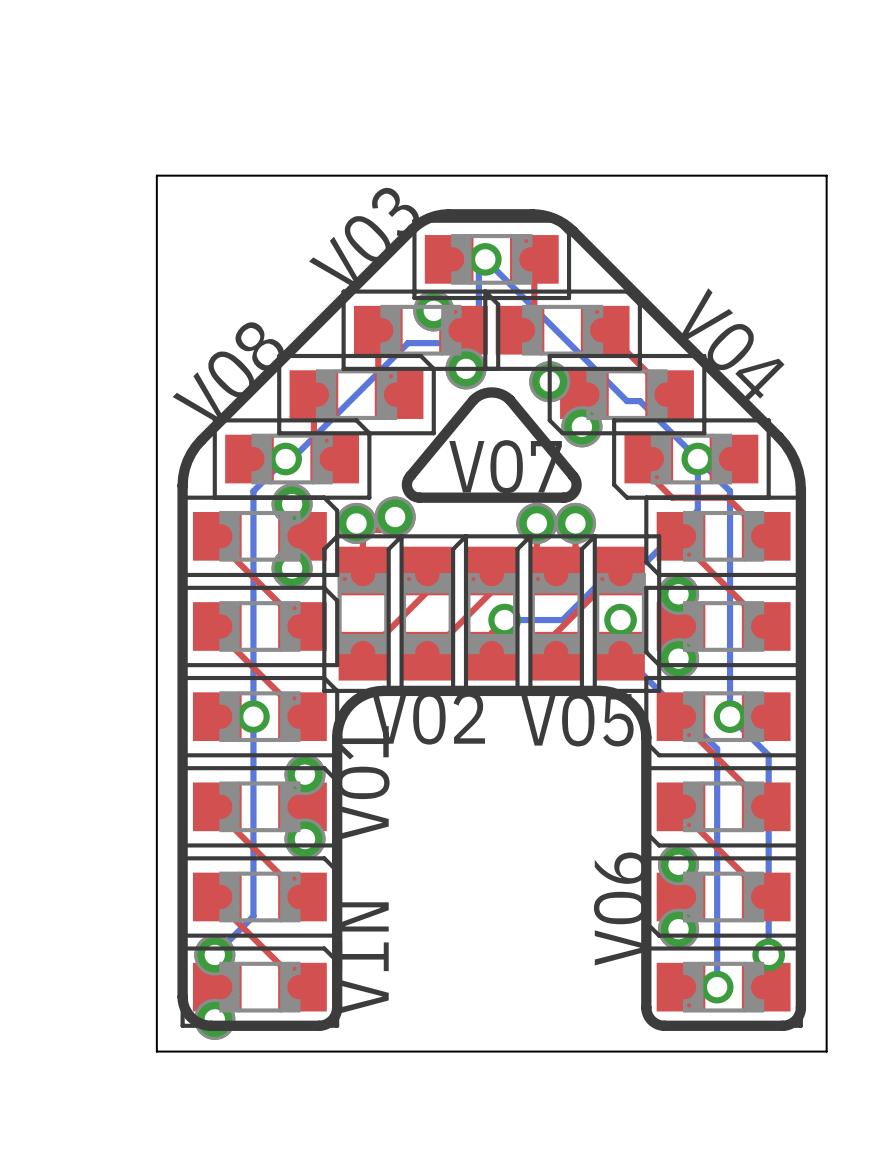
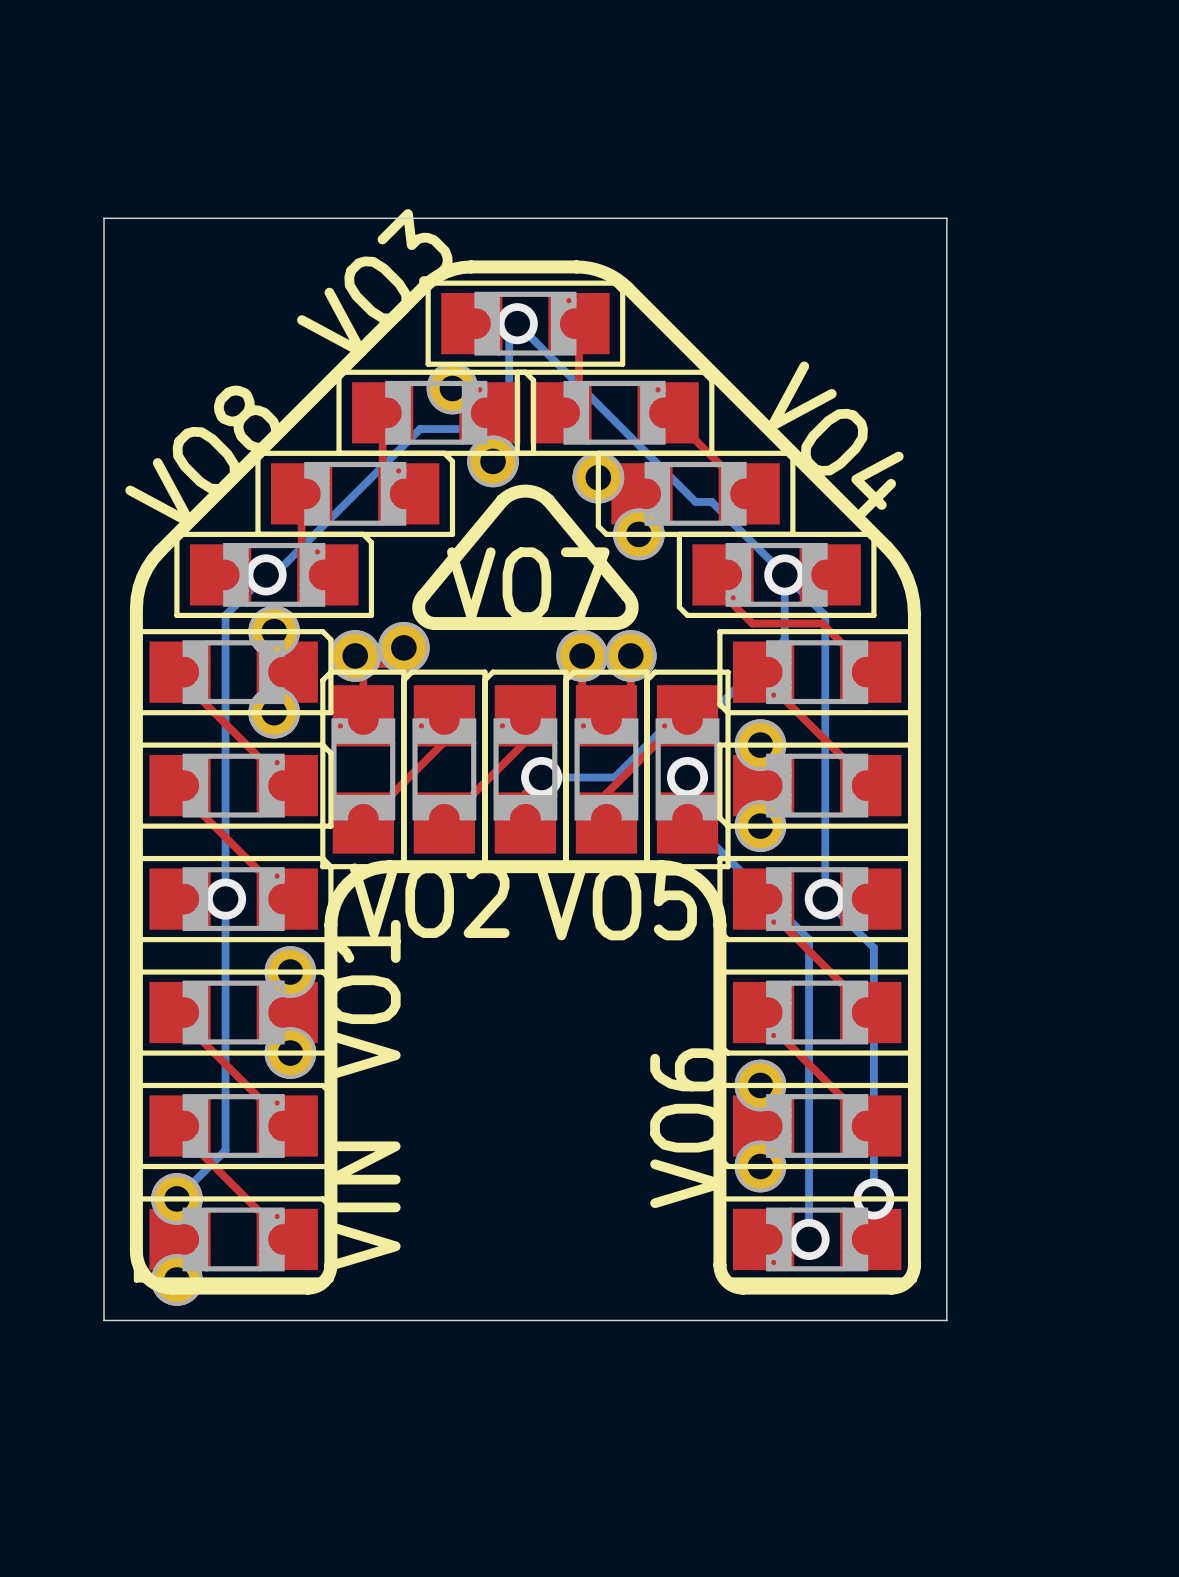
part footprint: [412, 218, 572, 301] -> [425, 280, 626, 367]
part footprint: [341, 289, 501, 371] -> [336, 369, 537, 456]
part footprint: [483, 289, 642, 371] -> [514, 369, 715, 456]
part footprint: [277, 353, 436, 436] -> [255, 450, 456, 537]
part footprint: [547, 353, 707, 436] -> [595, 450, 796, 537]
part footprint: [212, 418, 372, 500] -> [174, 531, 375, 619]
part footprint: [612, 418, 771, 500] -> [676, 531, 877, 619]
part footprint: [180, 495, 340, 578] -> [133, 629, 334, 716]
part footprint: [644, 495, 803, 578] -> [717, 629, 918, 716]
part footprint: [322, 534, 404, 693] -> [320, 669, 407, 870]
part footprint: [386, 534, 469, 693] -> [401, 669, 488, 870]
part footprint: [451, 534, 533, 693] -> [482, 669, 569, 870]
part footprint: [515, 534, 597, 693] -> [563, 669, 650, 870]
part footprint: [579, 534, 662, 693] -> [644, 669, 731, 870]
part footprint: [180, 585, 340, 668] -> [133, 742, 334, 829]
part footprint: [644, 585, 803, 668] -> [717, 742, 918, 829]
part footprint: [180, 675, 340, 758] -> [133, 855, 334, 943]
part footprint: [644, 675, 803, 758] -> [717, 855, 918, 943]
part footprint: [180, 766, 340, 848] -> [133, 969, 334, 1056]
part footprint: [644, 766, 803, 848] -> [717, 969, 918, 1056]
part footprint: [180, 856, 340, 938] -> [133, 1082, 334, 1170]
part footprint: [644, 856, 803, 938] -> [717, 1082, 918, 1170]
part footprint: [180, 946, 340, 1028] -> [133, 1196, 334, 1283]
part footprint: [644, 946, 803, 1028] -> [717, 1196, 918, 1283]

